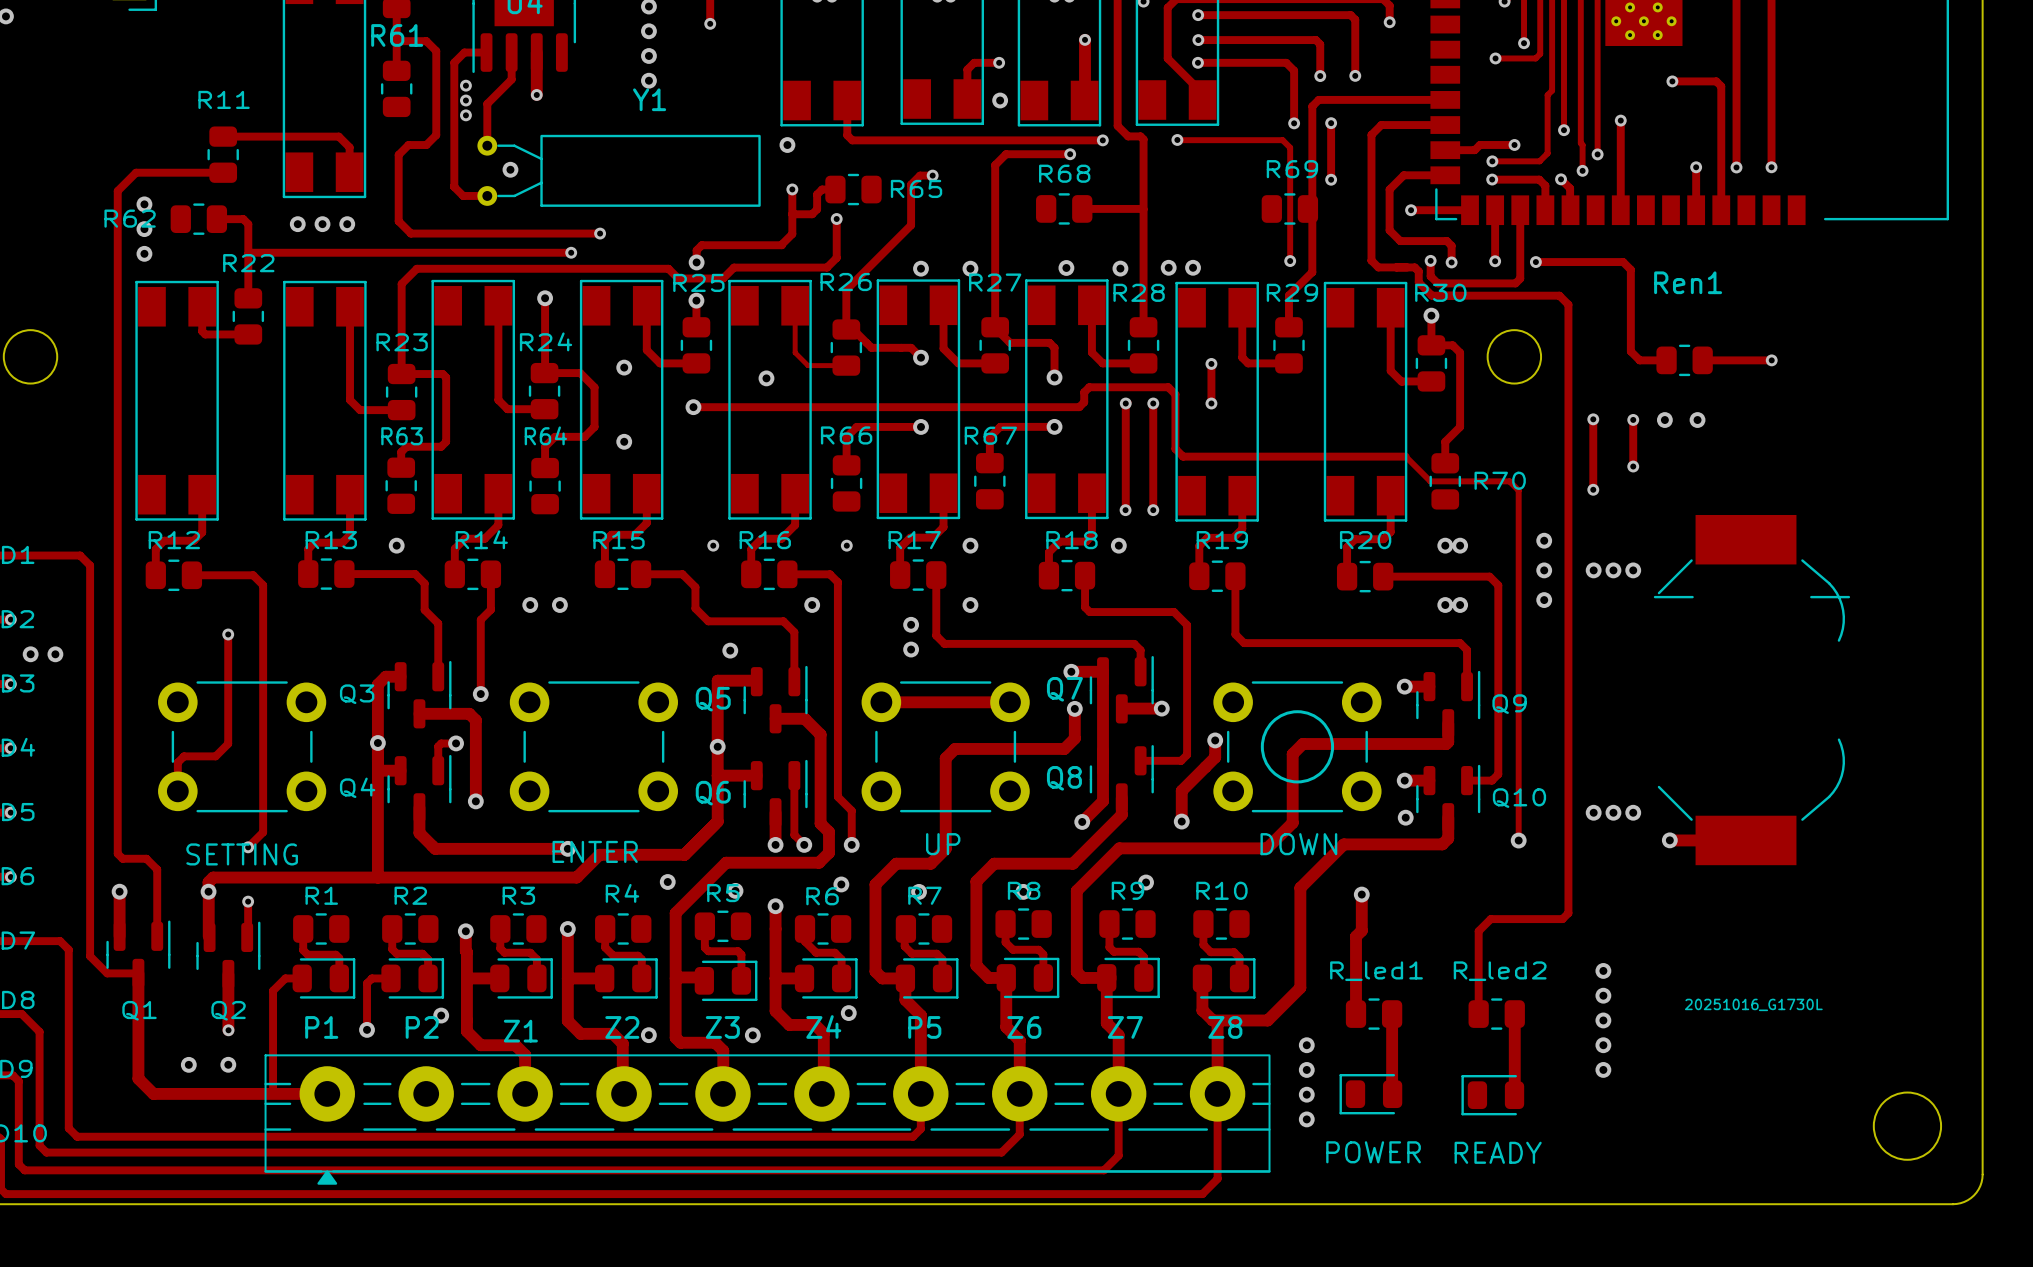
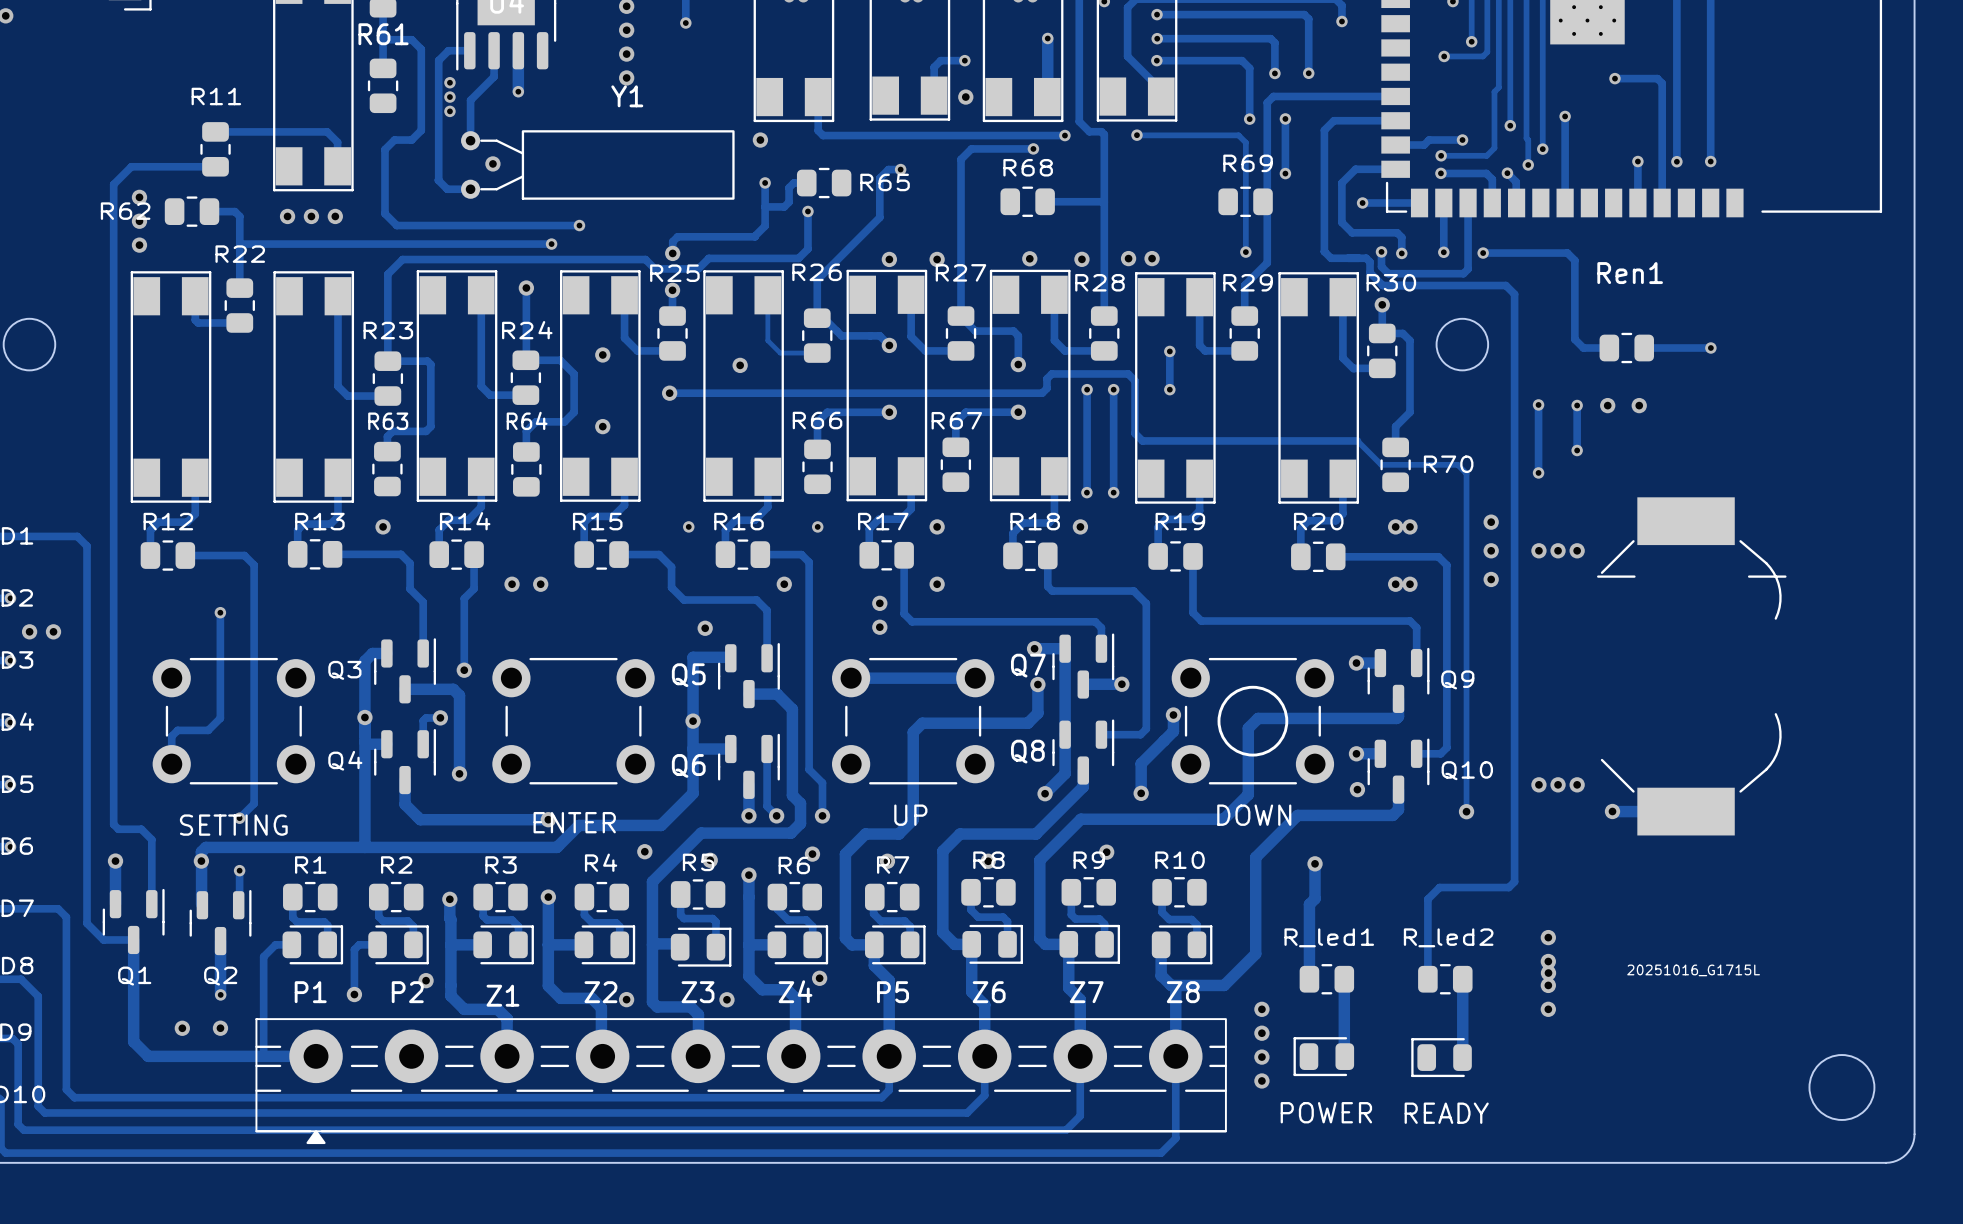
text: 20251016_G1730L (1753, 1004) -> 20251016_G1715L (1693, 970)
via position: (1603, 1069) -> (1548, 973)

